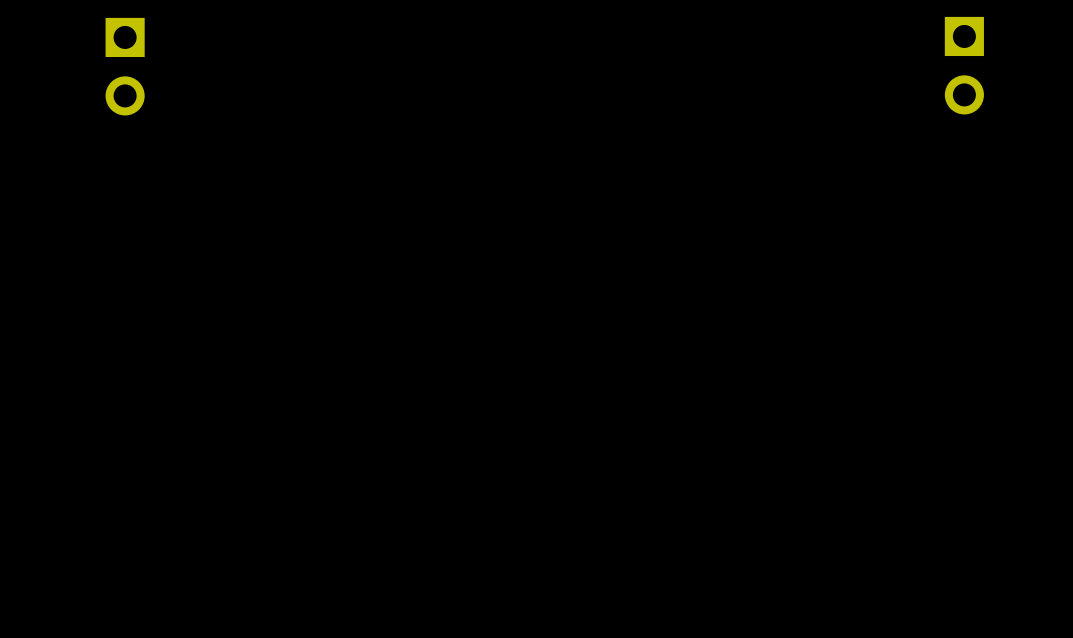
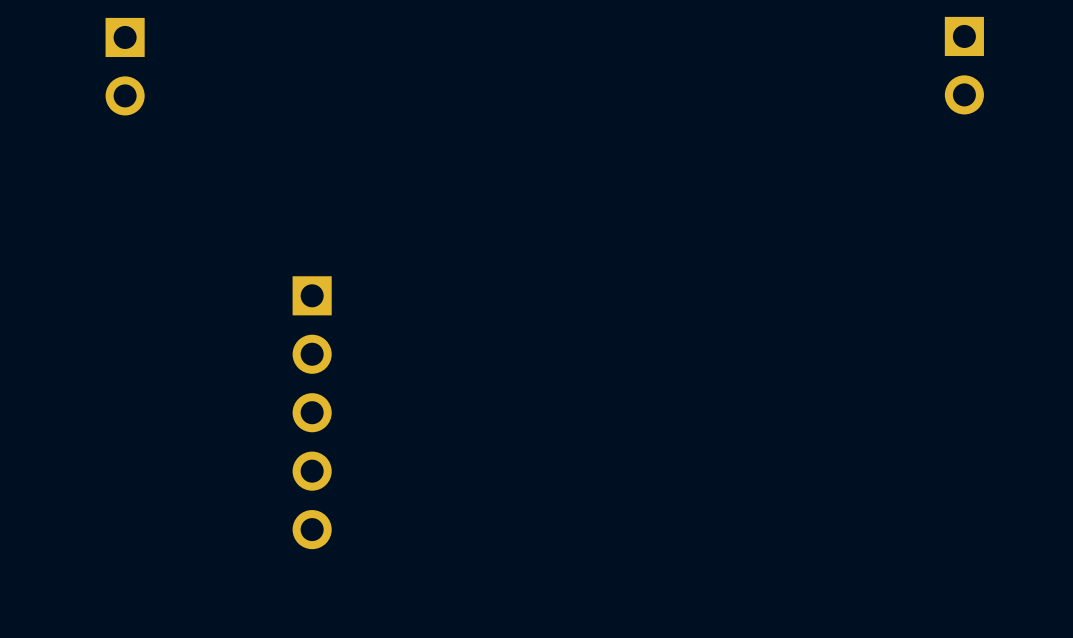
part: none -> (312, 412)

